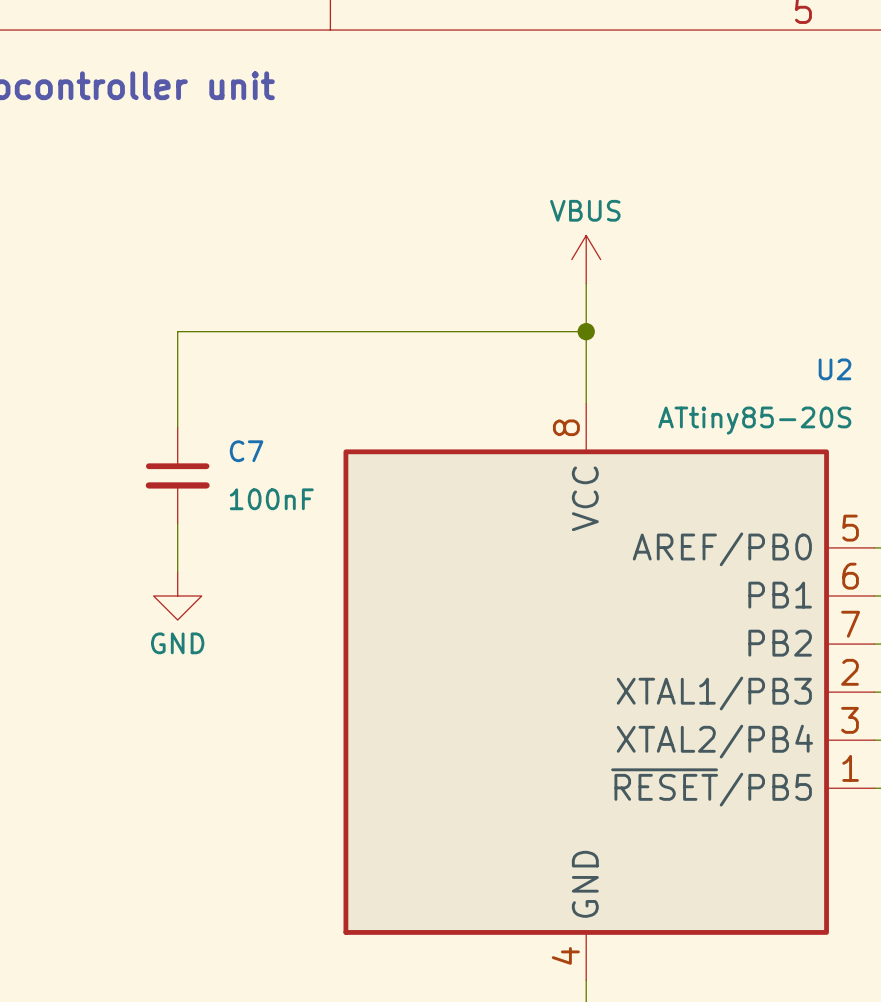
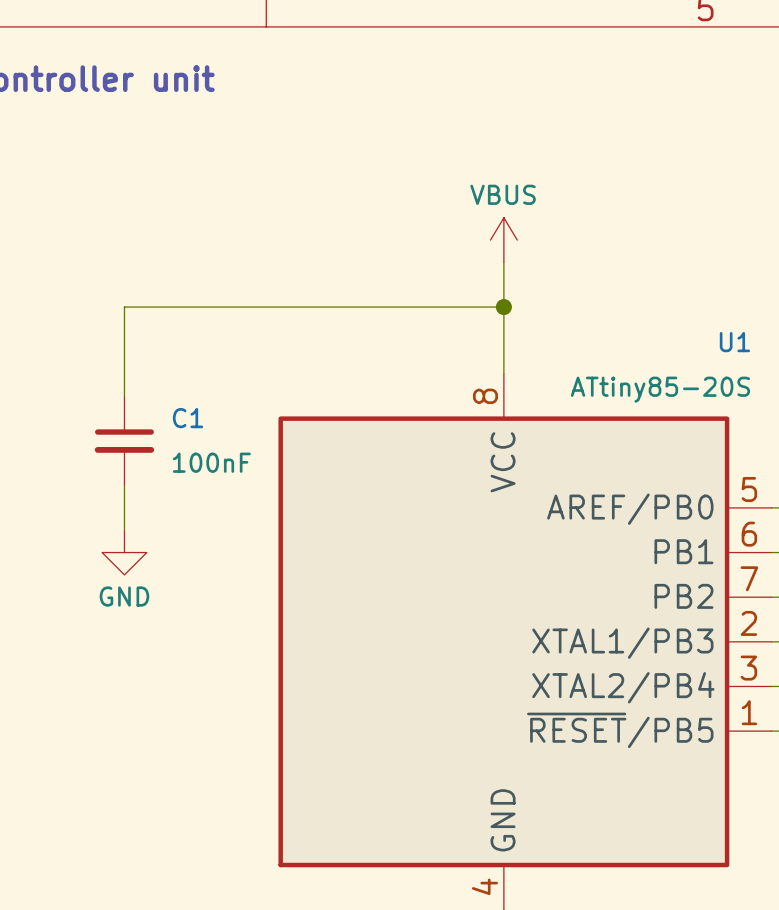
U2 name: U2 (835, 369) -> U1 (734, 342)
C7 name: C7 (246, 451) -> C1 (188, 418)

